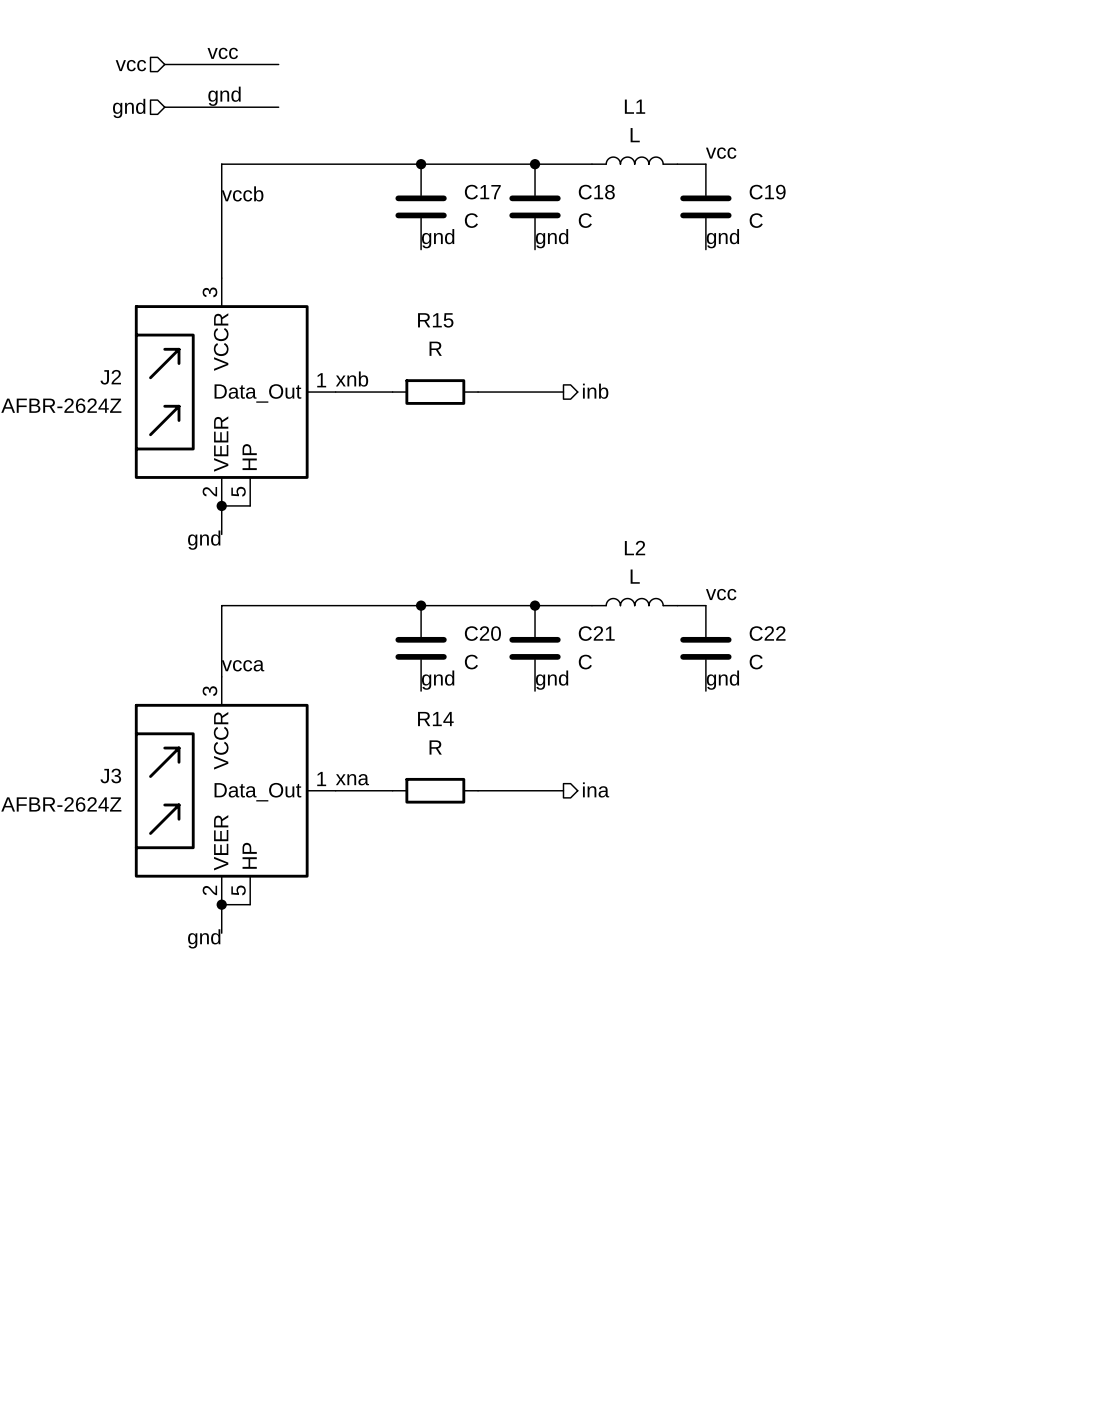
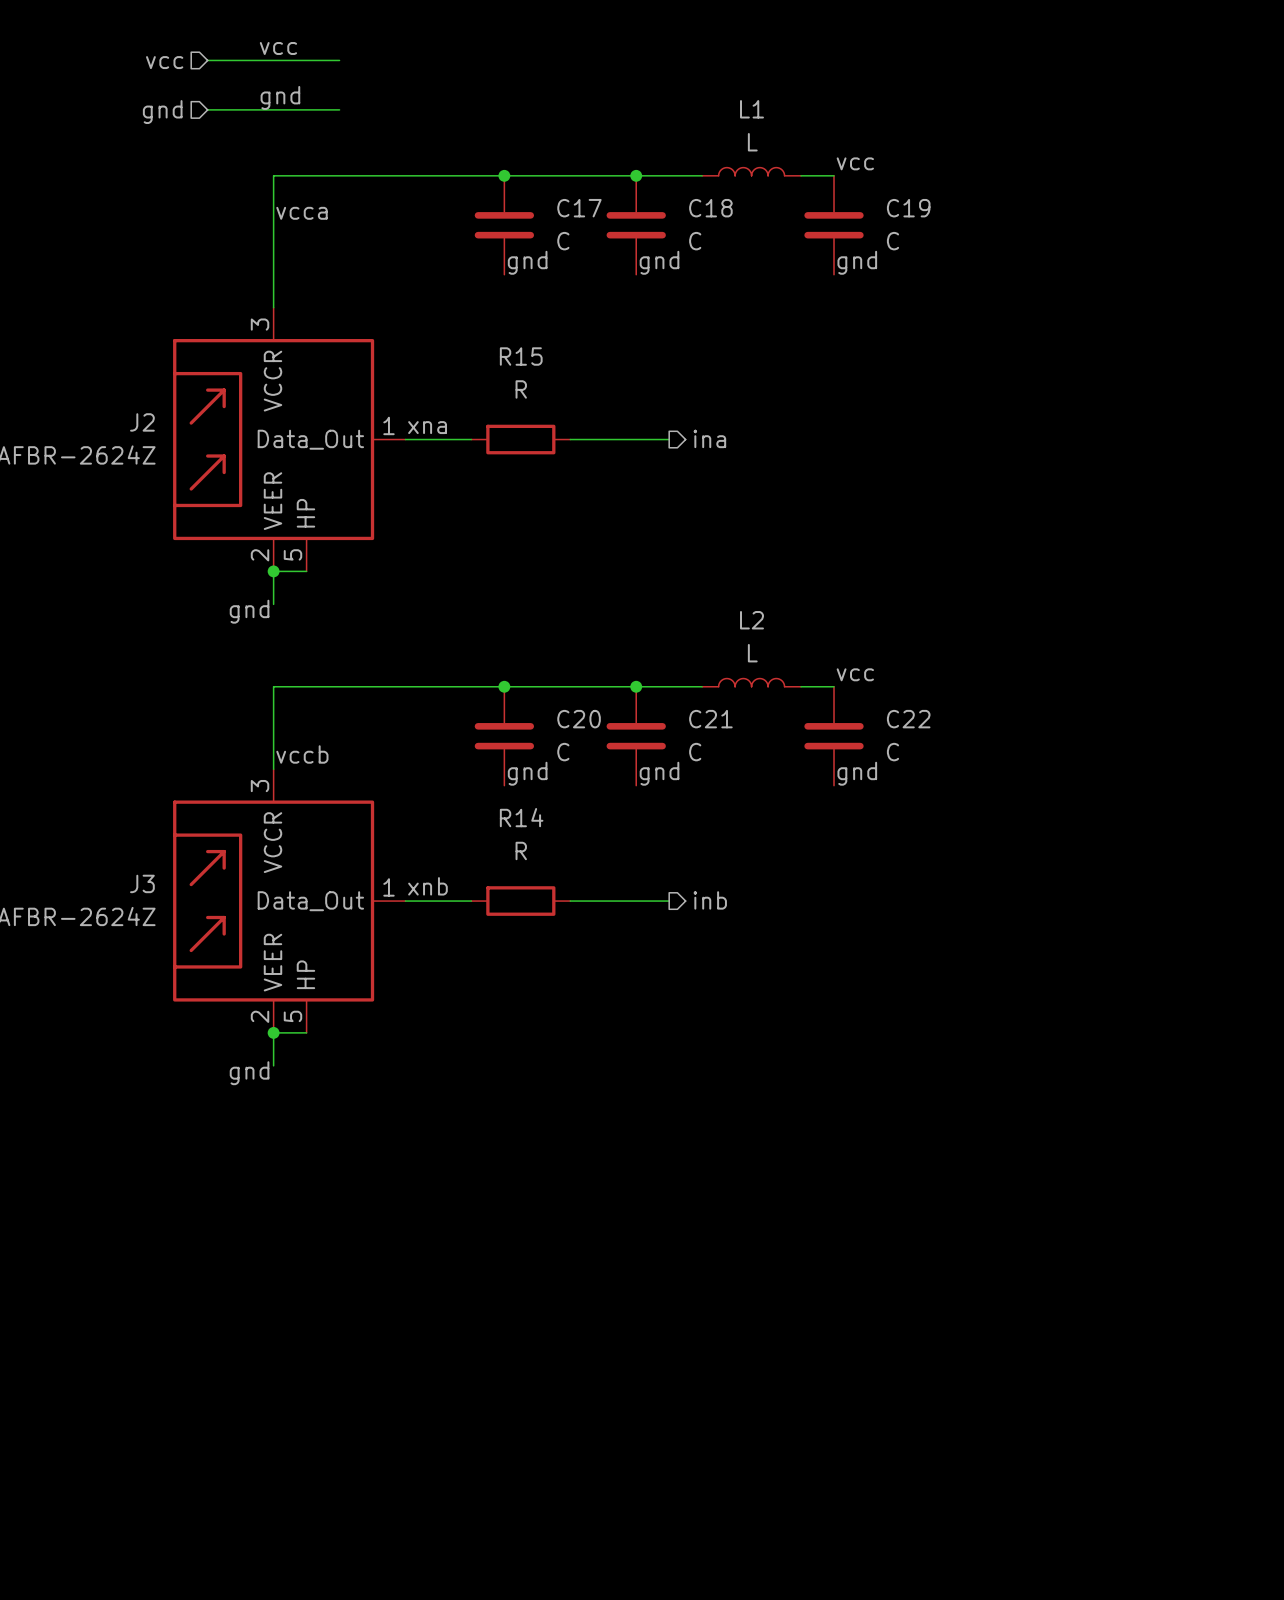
label: vccb (242, 193) -> vcca (301, 213)
label: xnb (352, 379) -> xna (427, 427)
hierarchical label: inb (595, 391) -> ina (709, 438)
label: vcca (243, 665) -> vccb (302, 754)
label: xna (352, 779) -> xnb (427, 886)
hierarchical label: ina (596, 789) -> inb (710, 900)

